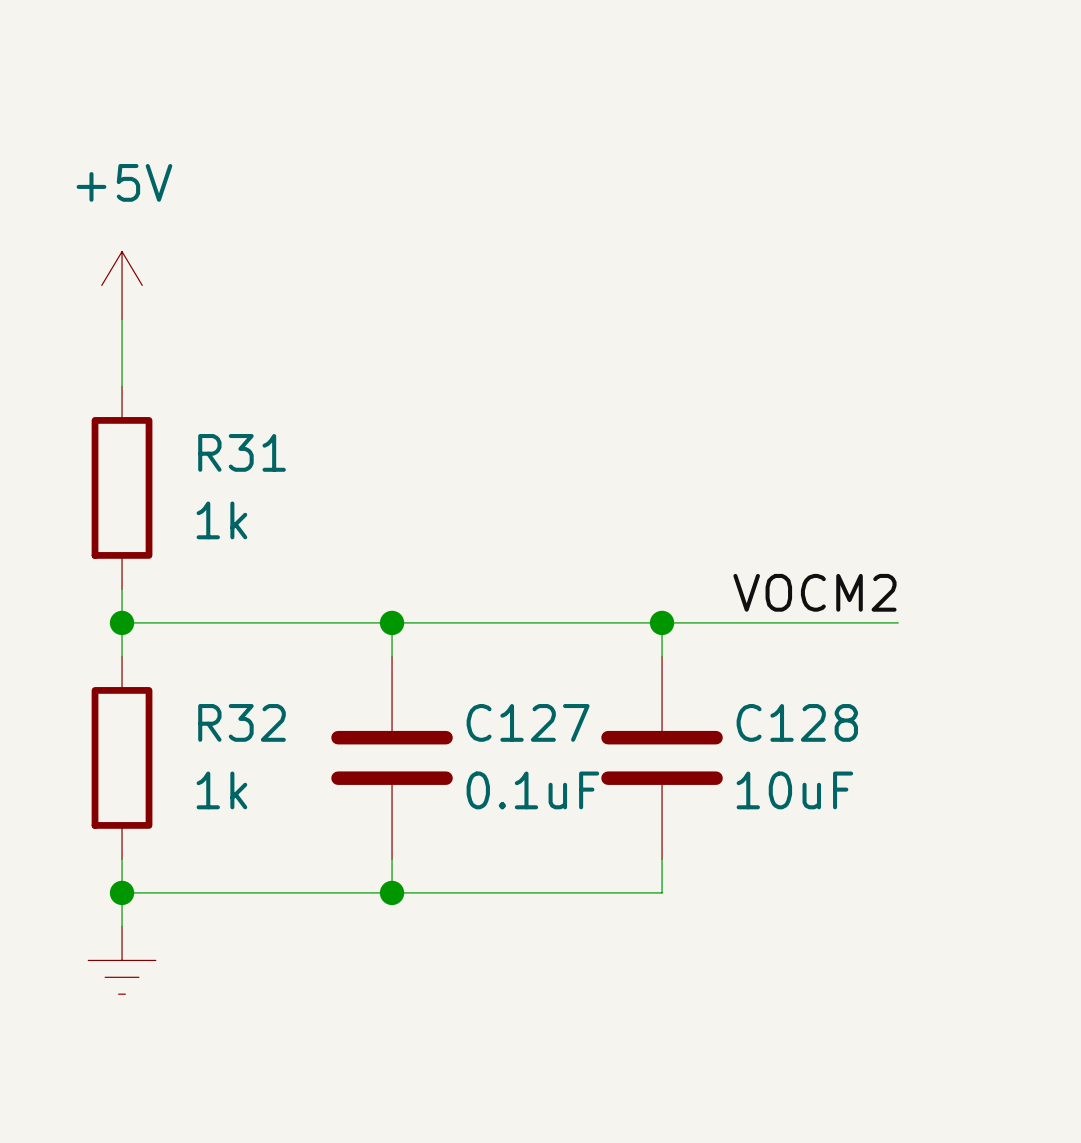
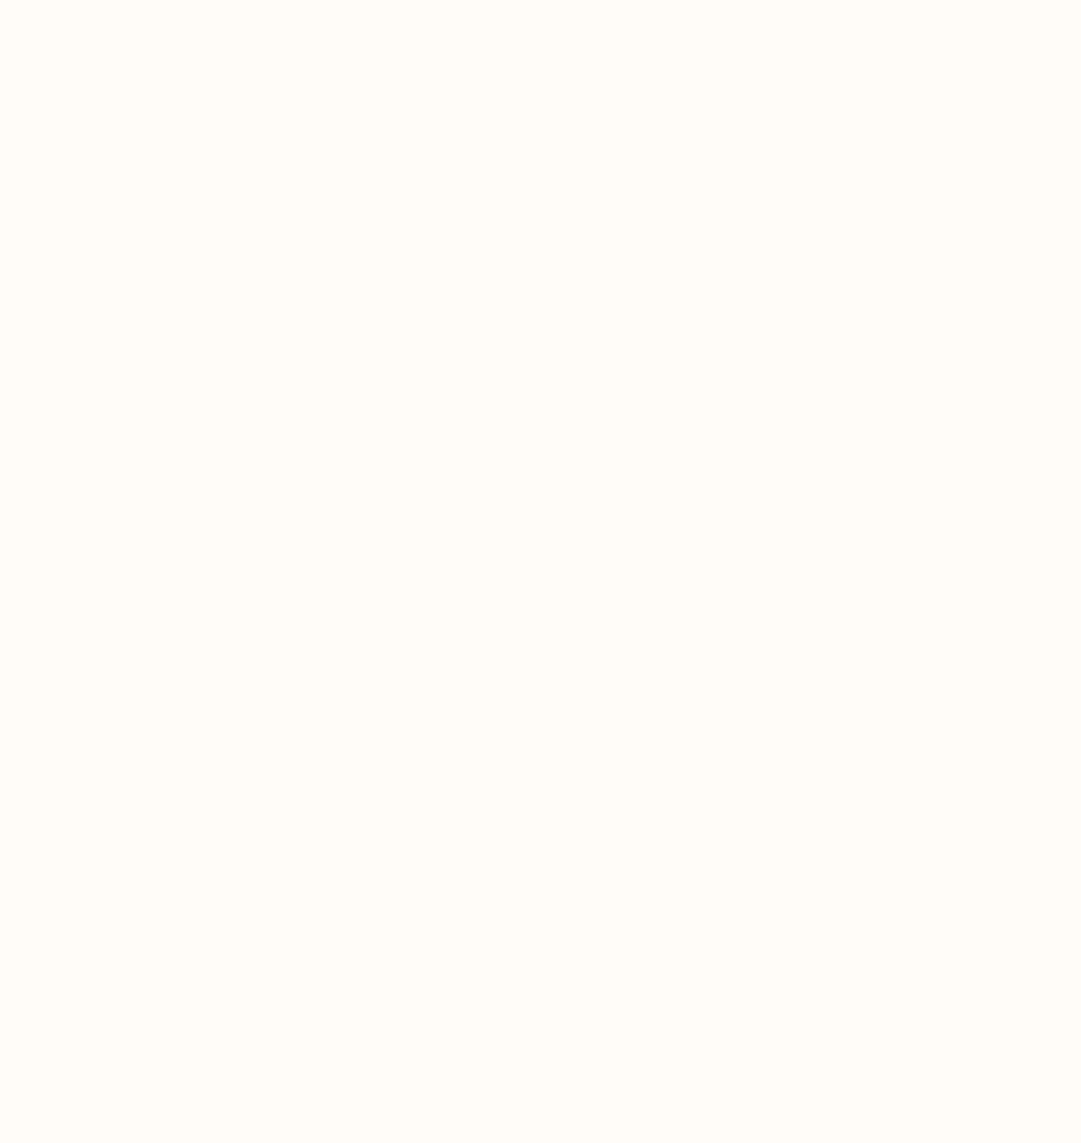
power symbol: +5V (122, 285) -> none
wire: (122, 319) (122, 386) -> none
R31: 1k (122, 487) -> none
wire: (122, 589) (122, 656) -> none
label: VOCM2 (814, 592) -> none
wire: (122, 622) (898, 622) -> none
junction: (122, 622) -> none
wire: (392, 622) (392, 656) -> none
junction: (392, 622) -> none
wire: (662, 622) (662, 656) -> none
junction: (662, 622) -> none
R32: 1k (122, 757) -> none
C127: 0.1uF (392, 757) -> none
C128: 10uF (662, 757) -> none
wire: (122, 859) (122, 926) -> none
wire: (392, 859) (392, 892) -> none
wire: (662, 859) (662, 892) (122, 892) -> none
junction: (122, 892) -> none
junction: (392, 892) -> none
power symbol: (122, 960) -> none

